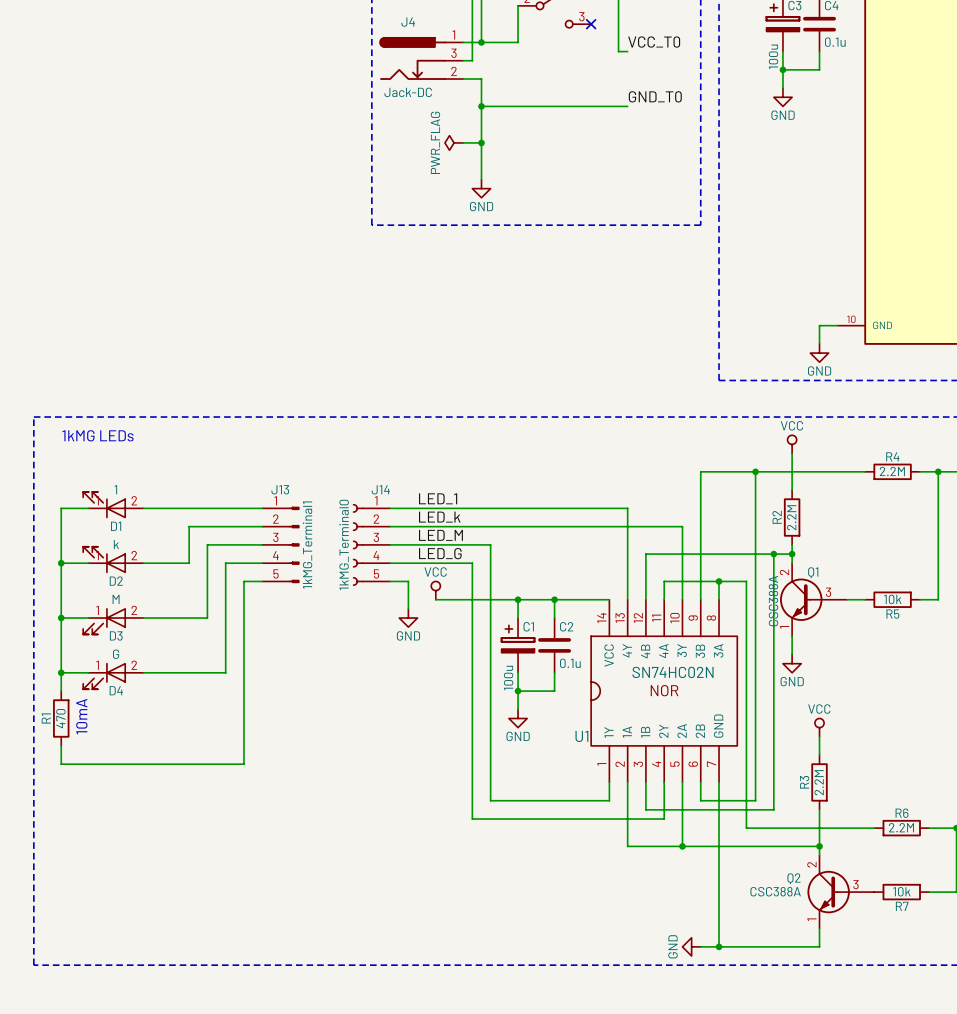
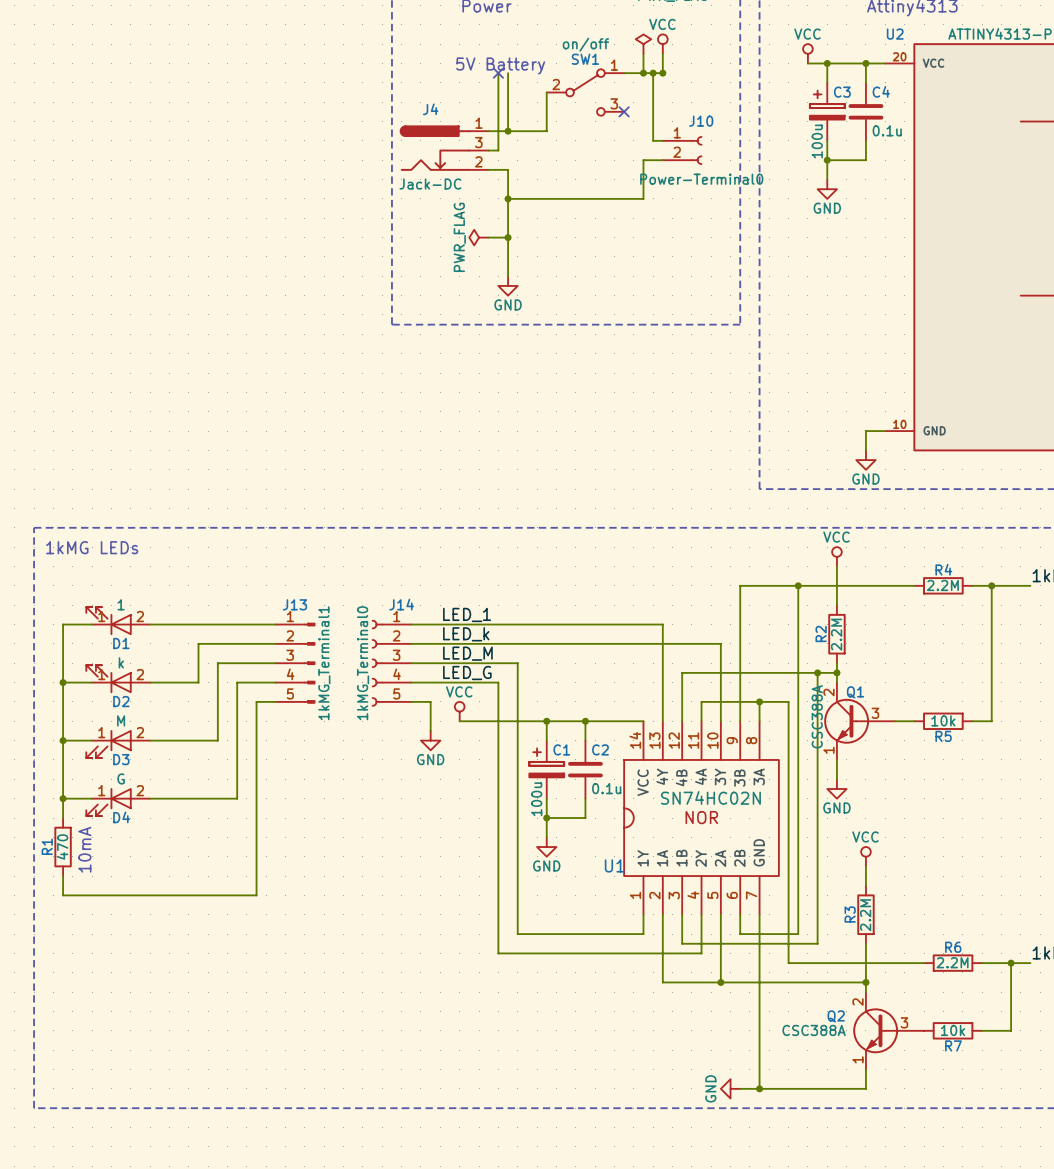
label: VCC_T0 (654, 42) -> none
J10: none -> Power-Terminal0 (682, 150)
label: GND_T0 (655, 96) -> none
wire: (609, 106) (627, 106) -> (643, 198) (643, 160) (662, 160)

